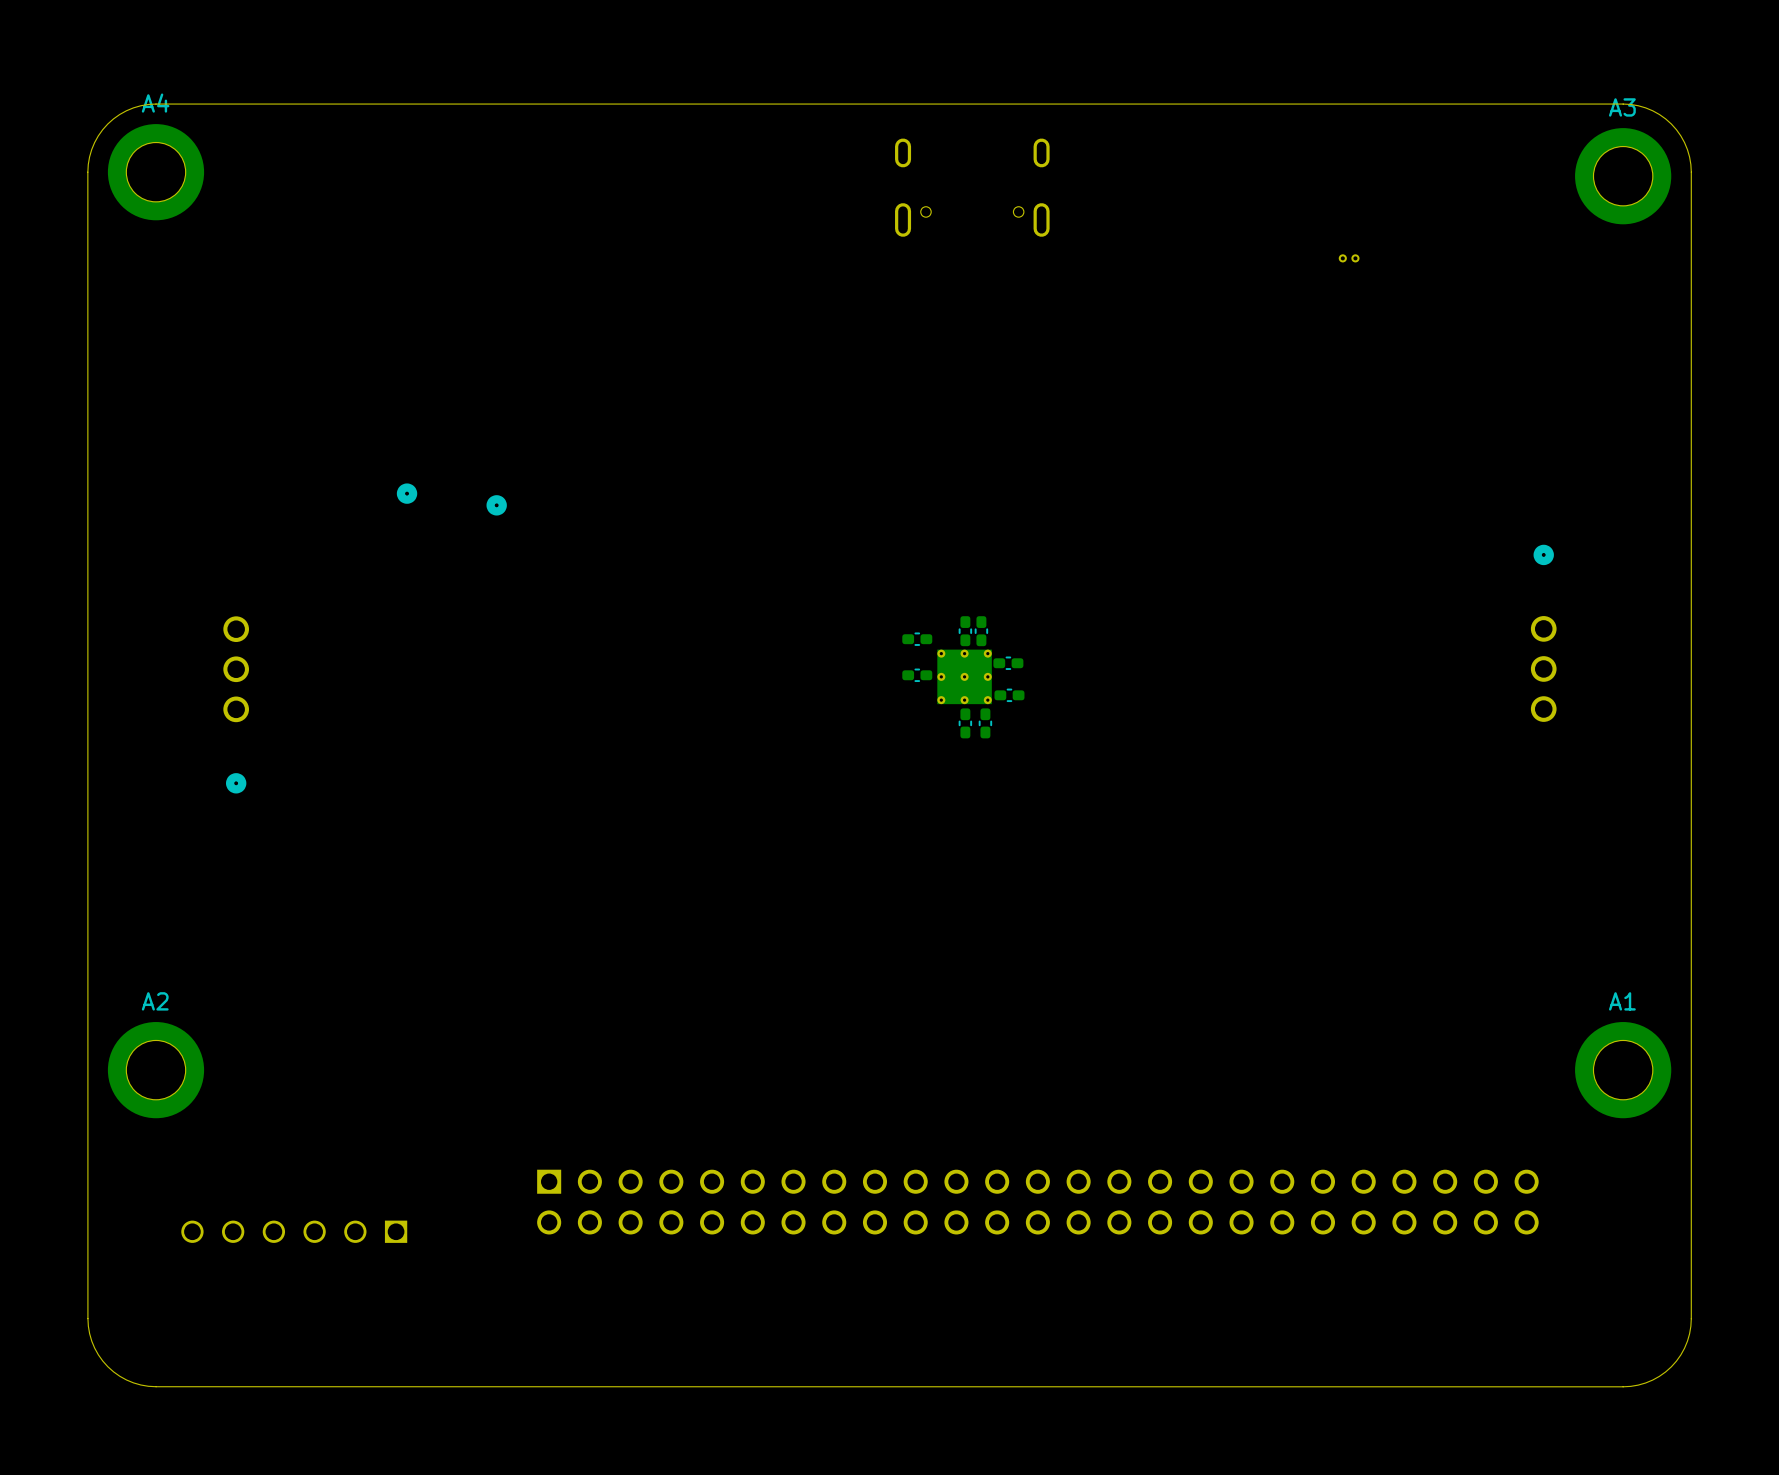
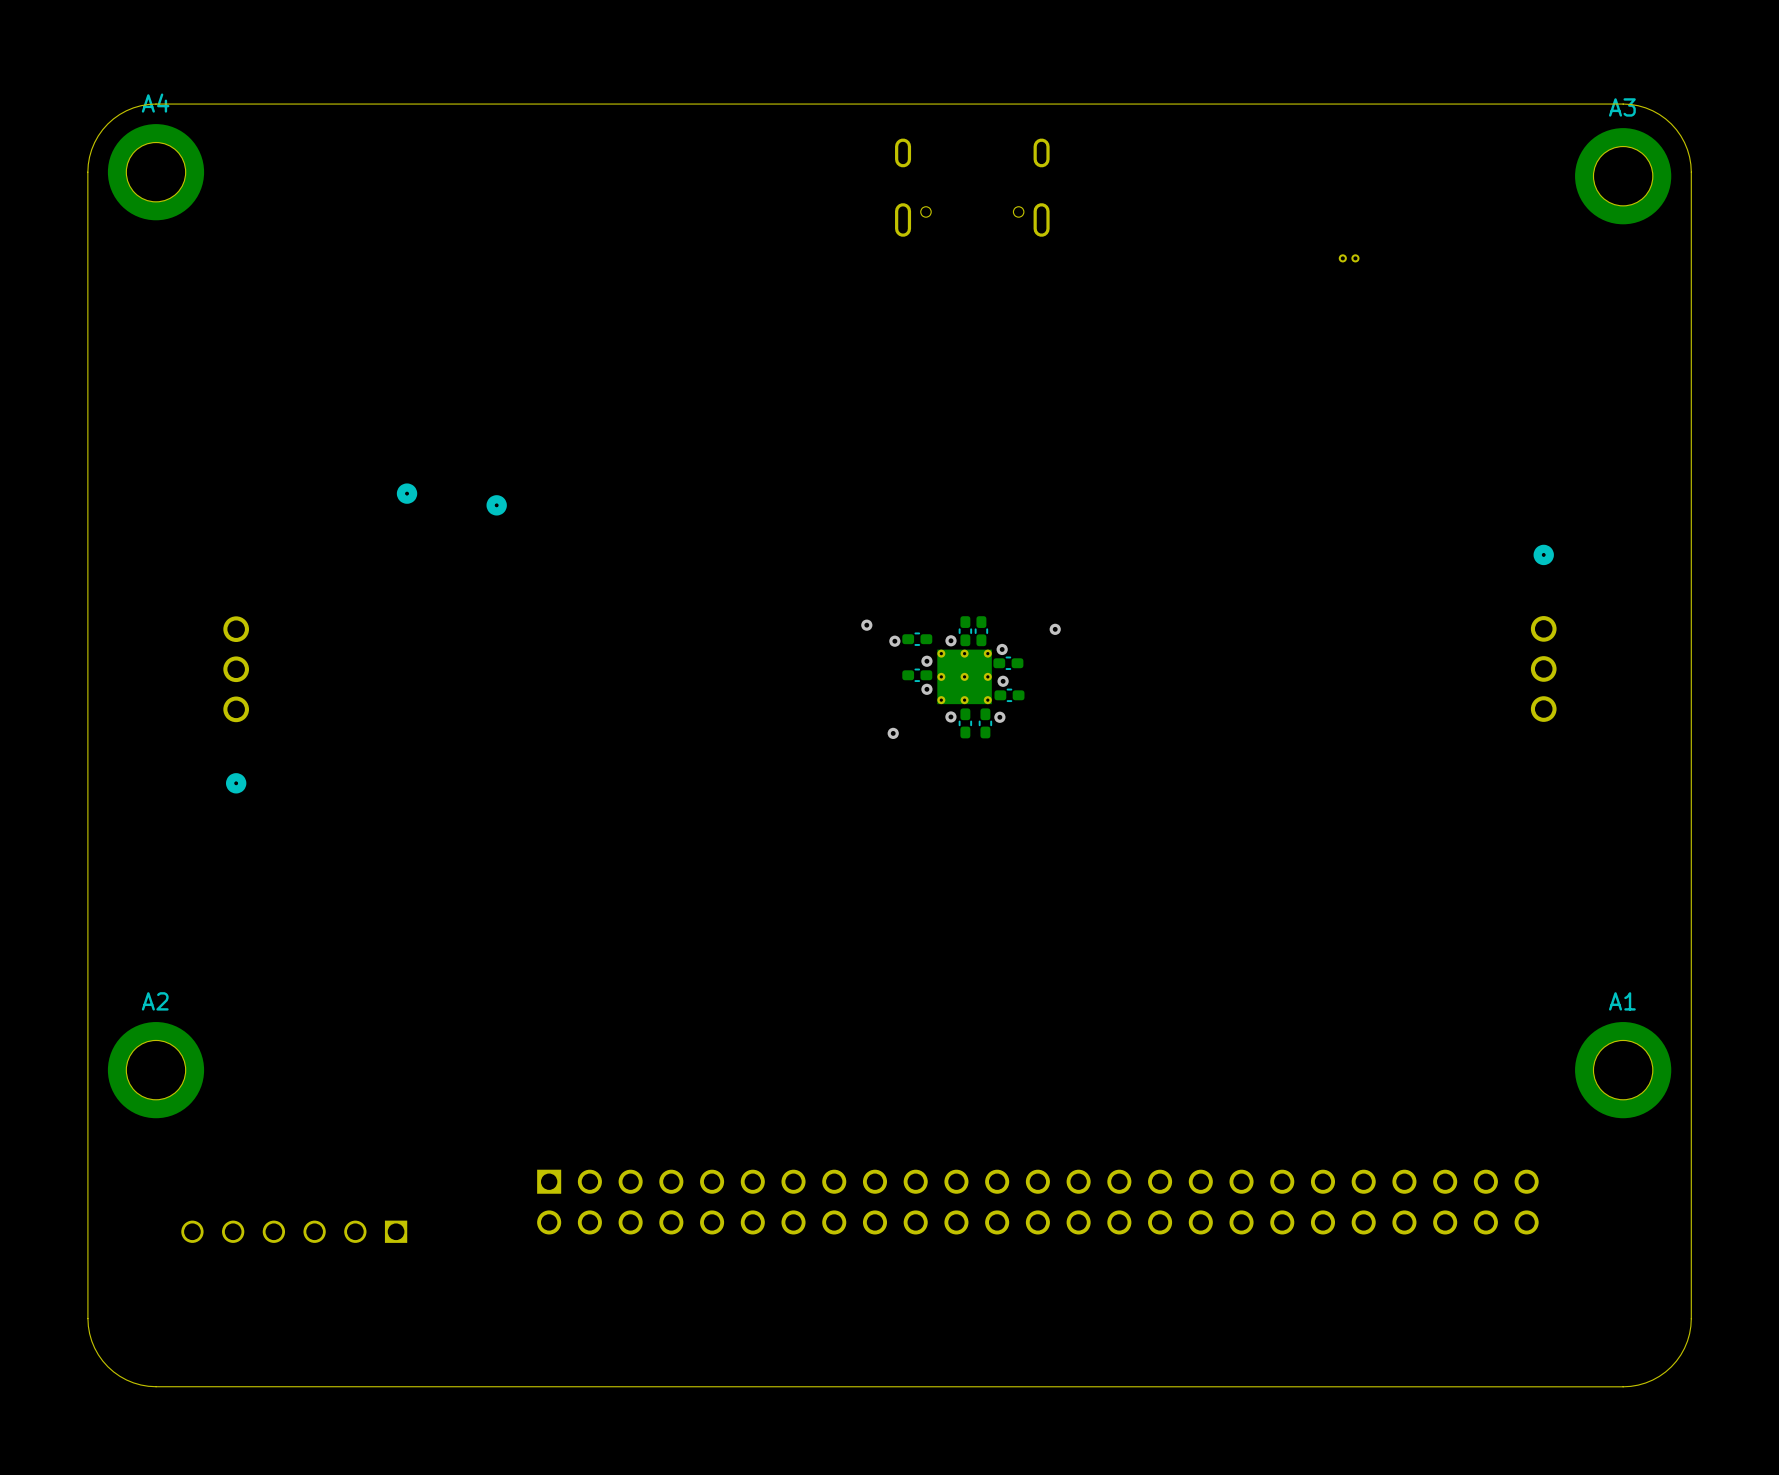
via: none -> (866, 625)
via: none -> (1055, 629)
via: none -> (950, 640)
via: none -> (894, 641)
via: none -> (1002, 649)
via: none -> (926, 661)
via: none -> (1003, 681)
via: none -> (926, 689)
via: none -> (950, 716)
via: none -> (999, 717)
via: none -> (893, 733)

